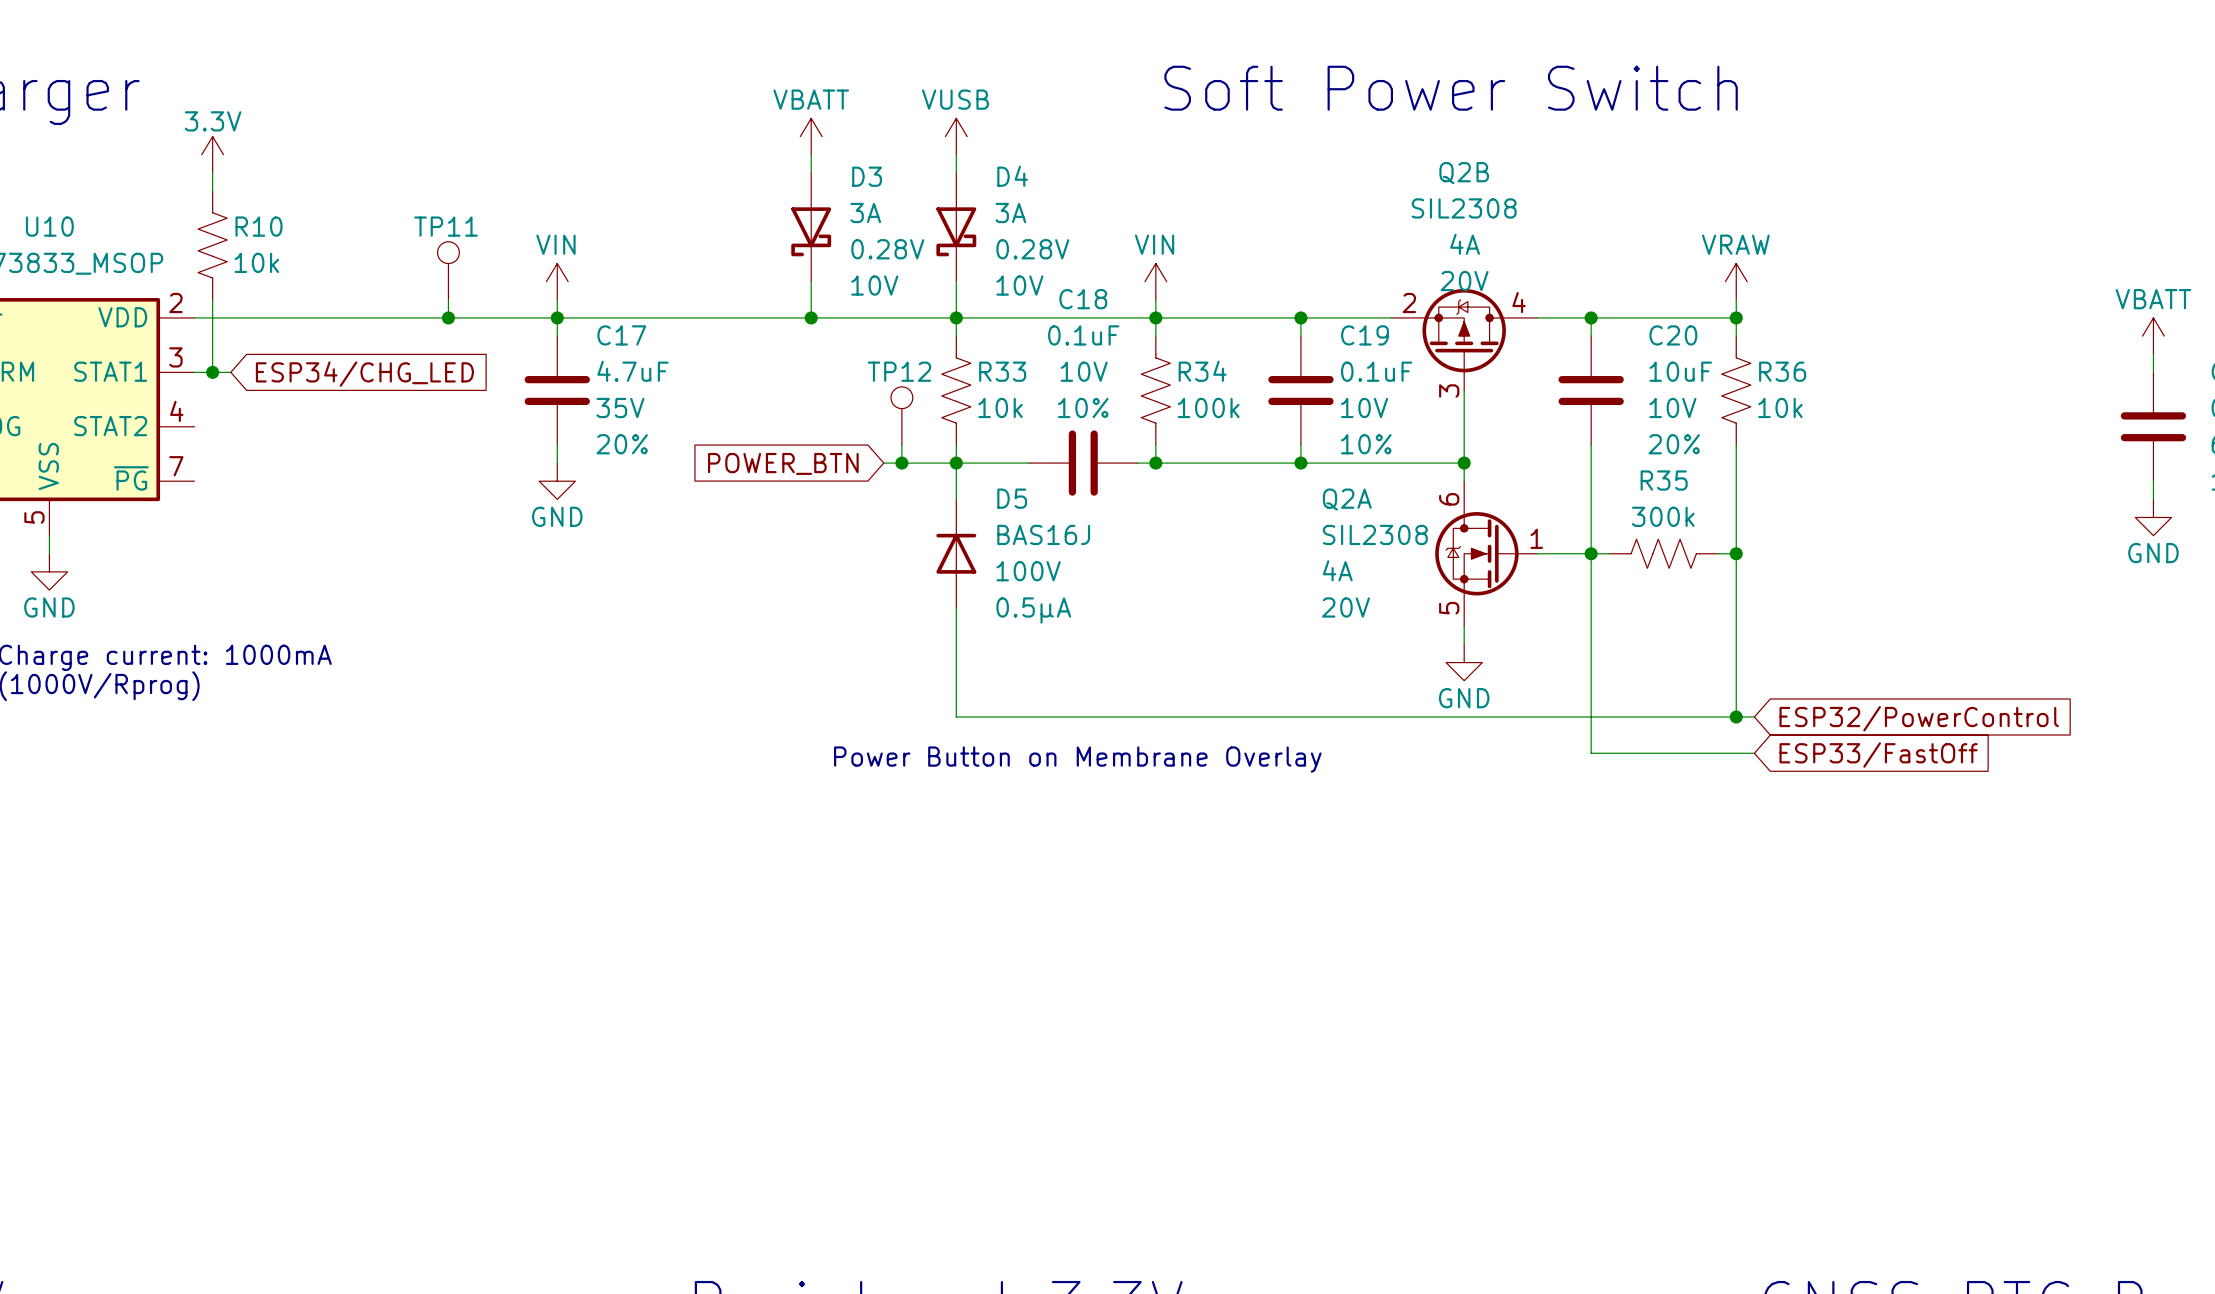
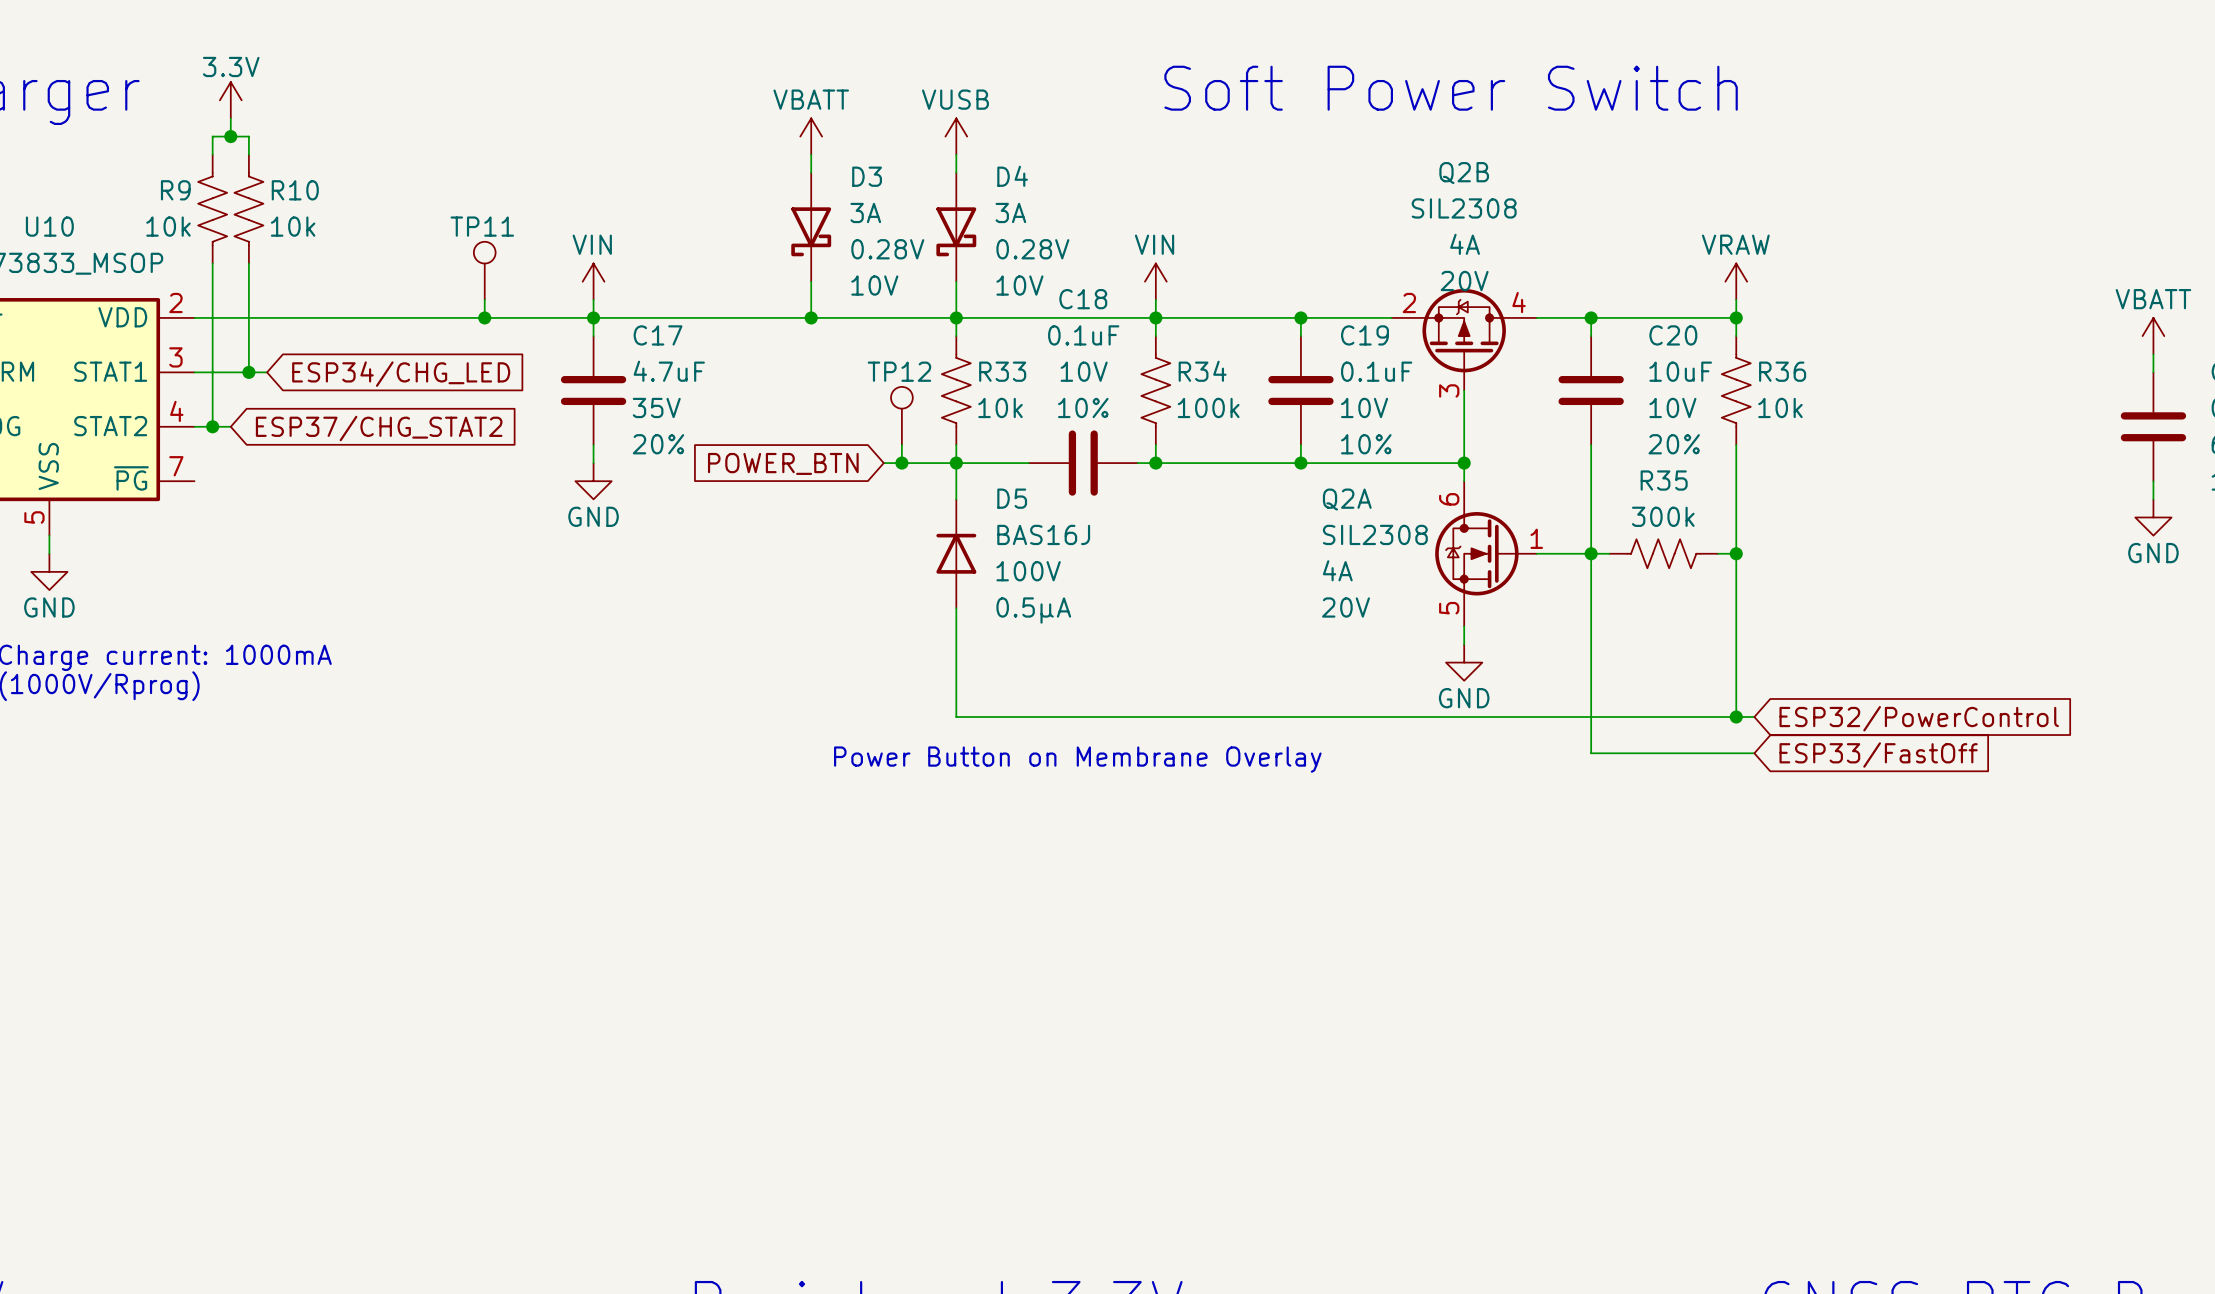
junction: none -> (230, 136)
wire: none -> (212, 154) (212, 136) (248, 136) (248, 154)
power symbol position: 3.3V (212, 154) -> 3.3V (230, 100)
wire: (212, 172) (212, 190) -> (230, 118) (230, 136)
R9: none -> 10k (212, 209)
R10 position: (212, 245) -> (248, 209)
wire: none -> (248, 263) (248, 372)
TP11 position: (448, 270) -> (484, 270)
power symbol position: VIN (557, 281) -> VIN (593, 281)
wire: (448, 299) (448, 317) -> (484, 299) (484, 317)
wire: (557, 299) (557, 336) -> (593, 299) (593, 336)
junction: (448, 317) -> none
junction: none -> (484, 317)
junction: (557, 317) -> none
junction: none -> (593, 317)
wire: none -> (212, 372) (212, 426)
junction: (212, 372) -> none
wire: none -> (230, 372) (267, 372)
junction: none -> (248, 372)
global label position: ESP34/CHG_LED (364, 374) -> ESP34/CHG_LED (401, 374)
C17 position: (557, 390) -> (593, 390)
wire: none -> (194, 426) (230, 426)
junction: none -> (212, 426)
global label: none -> ESP37/CHG_STAT2 (379, 428)
wire: (557, 444) (557, 463) -> (593, 444) (593, 463)
power symbol position: GND (557, 481) -> GND (593, 481)

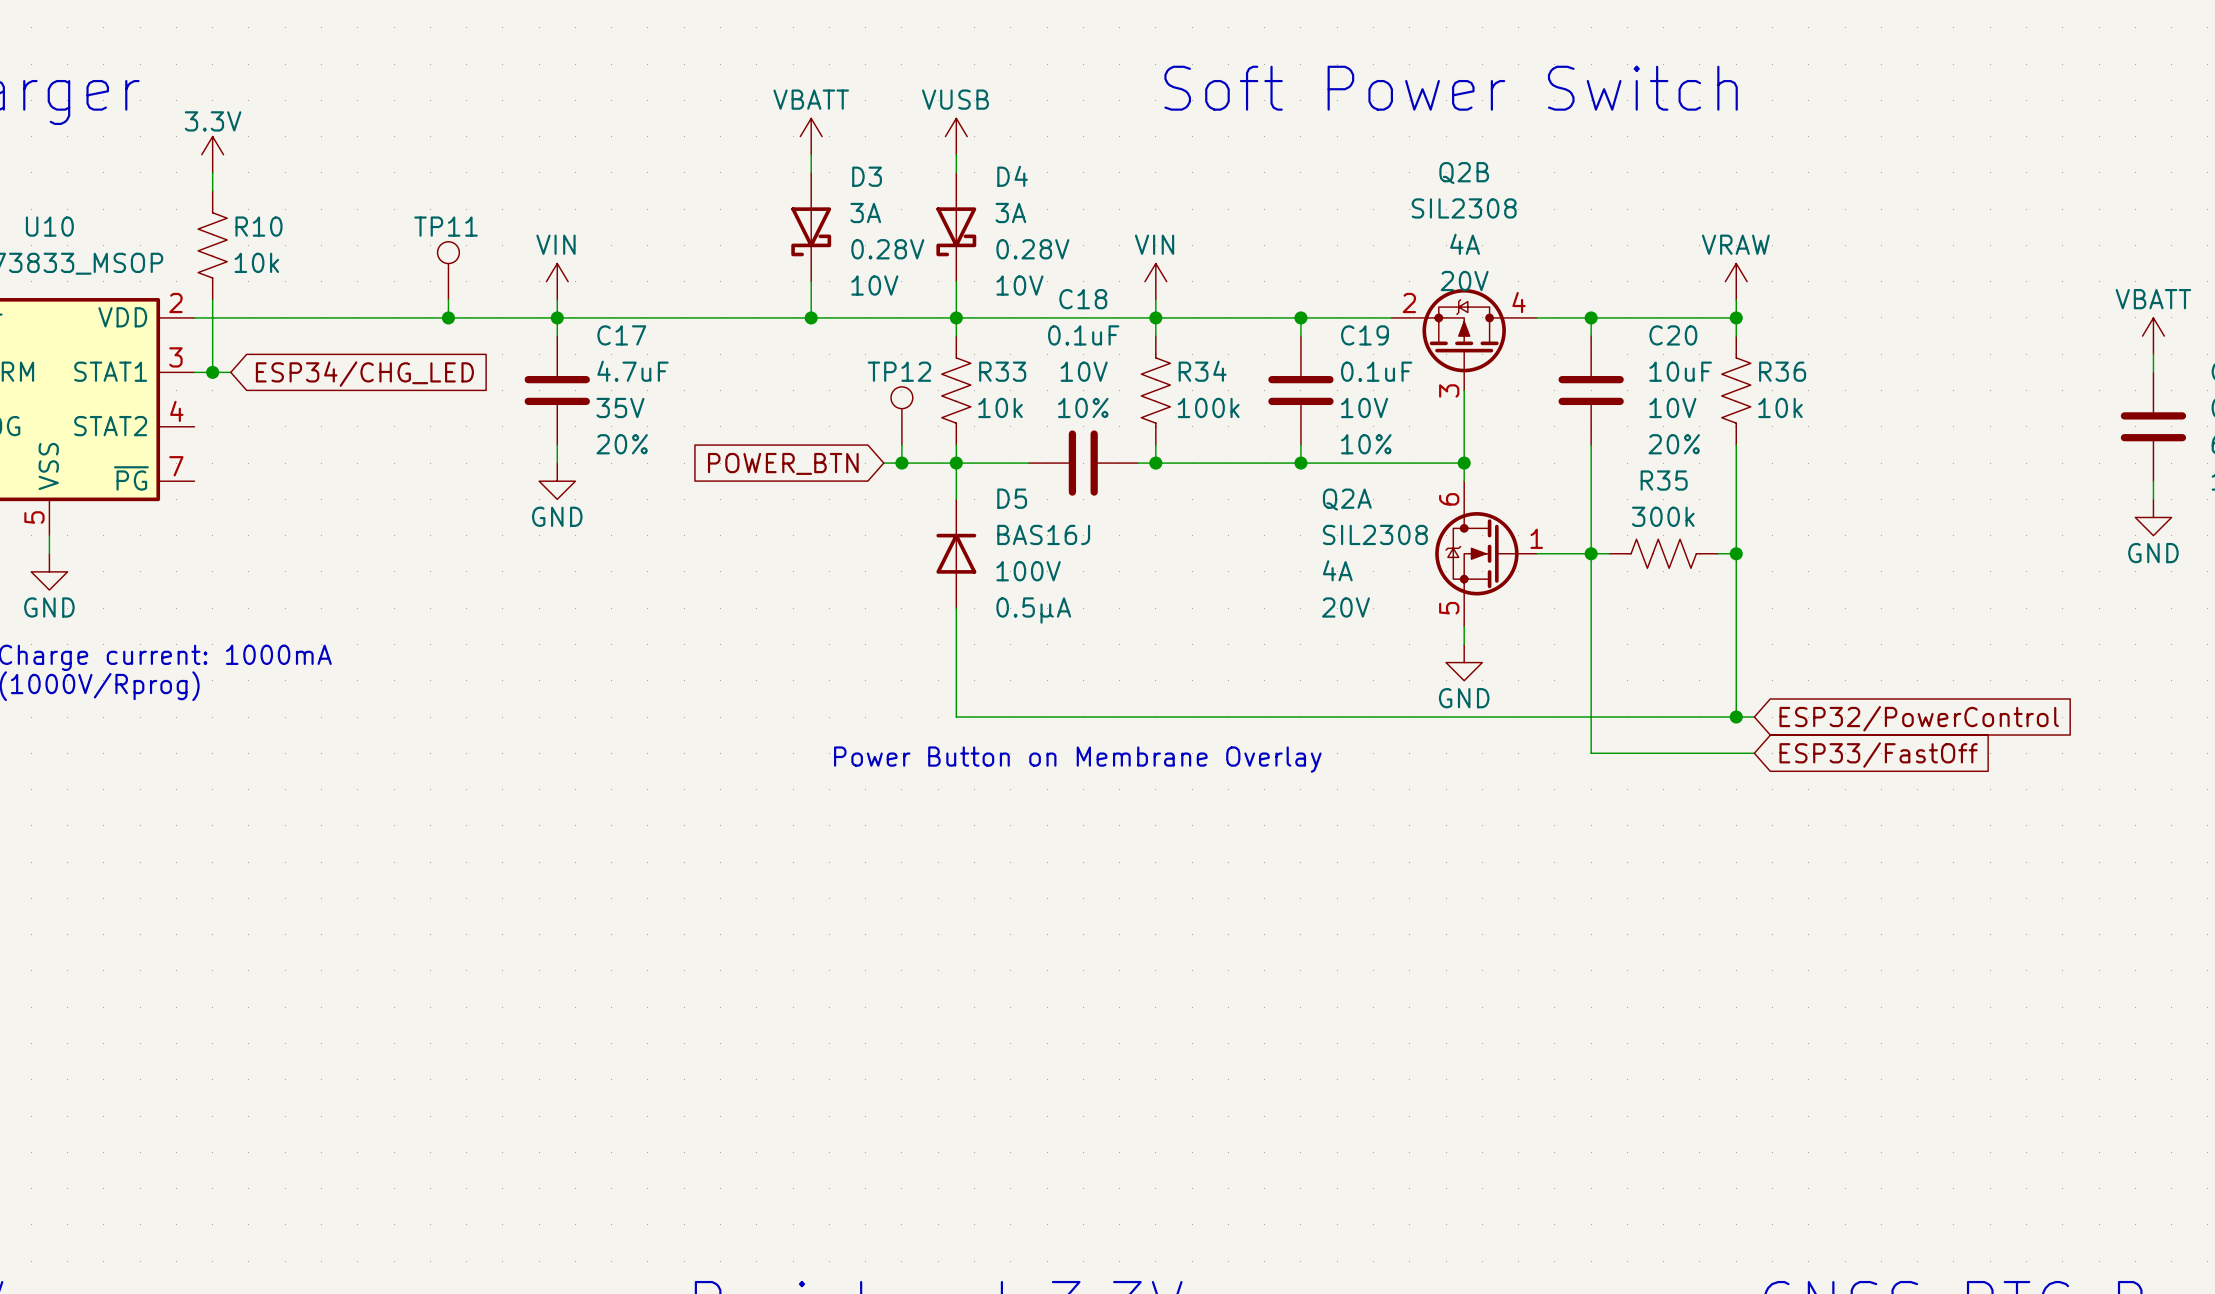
power symbol position: 3.3V (230, 100) -> 3.3V (212, 154)
wire: (230, 118) (230, 136) -> (212, 172) (212, 190)
junction: (230, 136) -> none
wire: (212, 154) (212, 136) (248, 136) (248, 154) -> none
R9: 10k (212, 209) -> none
R10 position: (248, 209) -> (212, 245)
wire: (248, 263) (248, 372) -> none
TP11 position: (484, 270) -> (448, 270)
power symbol position: VIN (593, 281) -> VIN (557, 281)
wire: (484, 299) (484, 317) -> (448, 299) (448, 317)
wire: (593, 299) (593, 336) -> (557, 299) (557, 336)
junction: none -> (448, 317)
junction: (484, 317) -> none
junction: none -> (557, 317)
junction: (593, 317) -> none
wire: (212, 372) (212, 426) -> none
junction: none -> (212, 372)
wire: (230, 372) (267, 372) -> none
junction: (248, 372) -> none
global label position: ESP34/CHG_LED (401, 374) -> ESP34/CHG_LED (364, 374)
C17 position: (593, 390) -> (557, 390)
wire: (194, 426) (230, 426) -> none
junction: (212, 426) -> none
global label: ESP37/CHG_STAT2 (379, 428) -> none
wire: (593, 444) (593, 463) -> (557, 444) (557, 463)
power symbol position: GND (593, 481) -> GND (557, 481)

